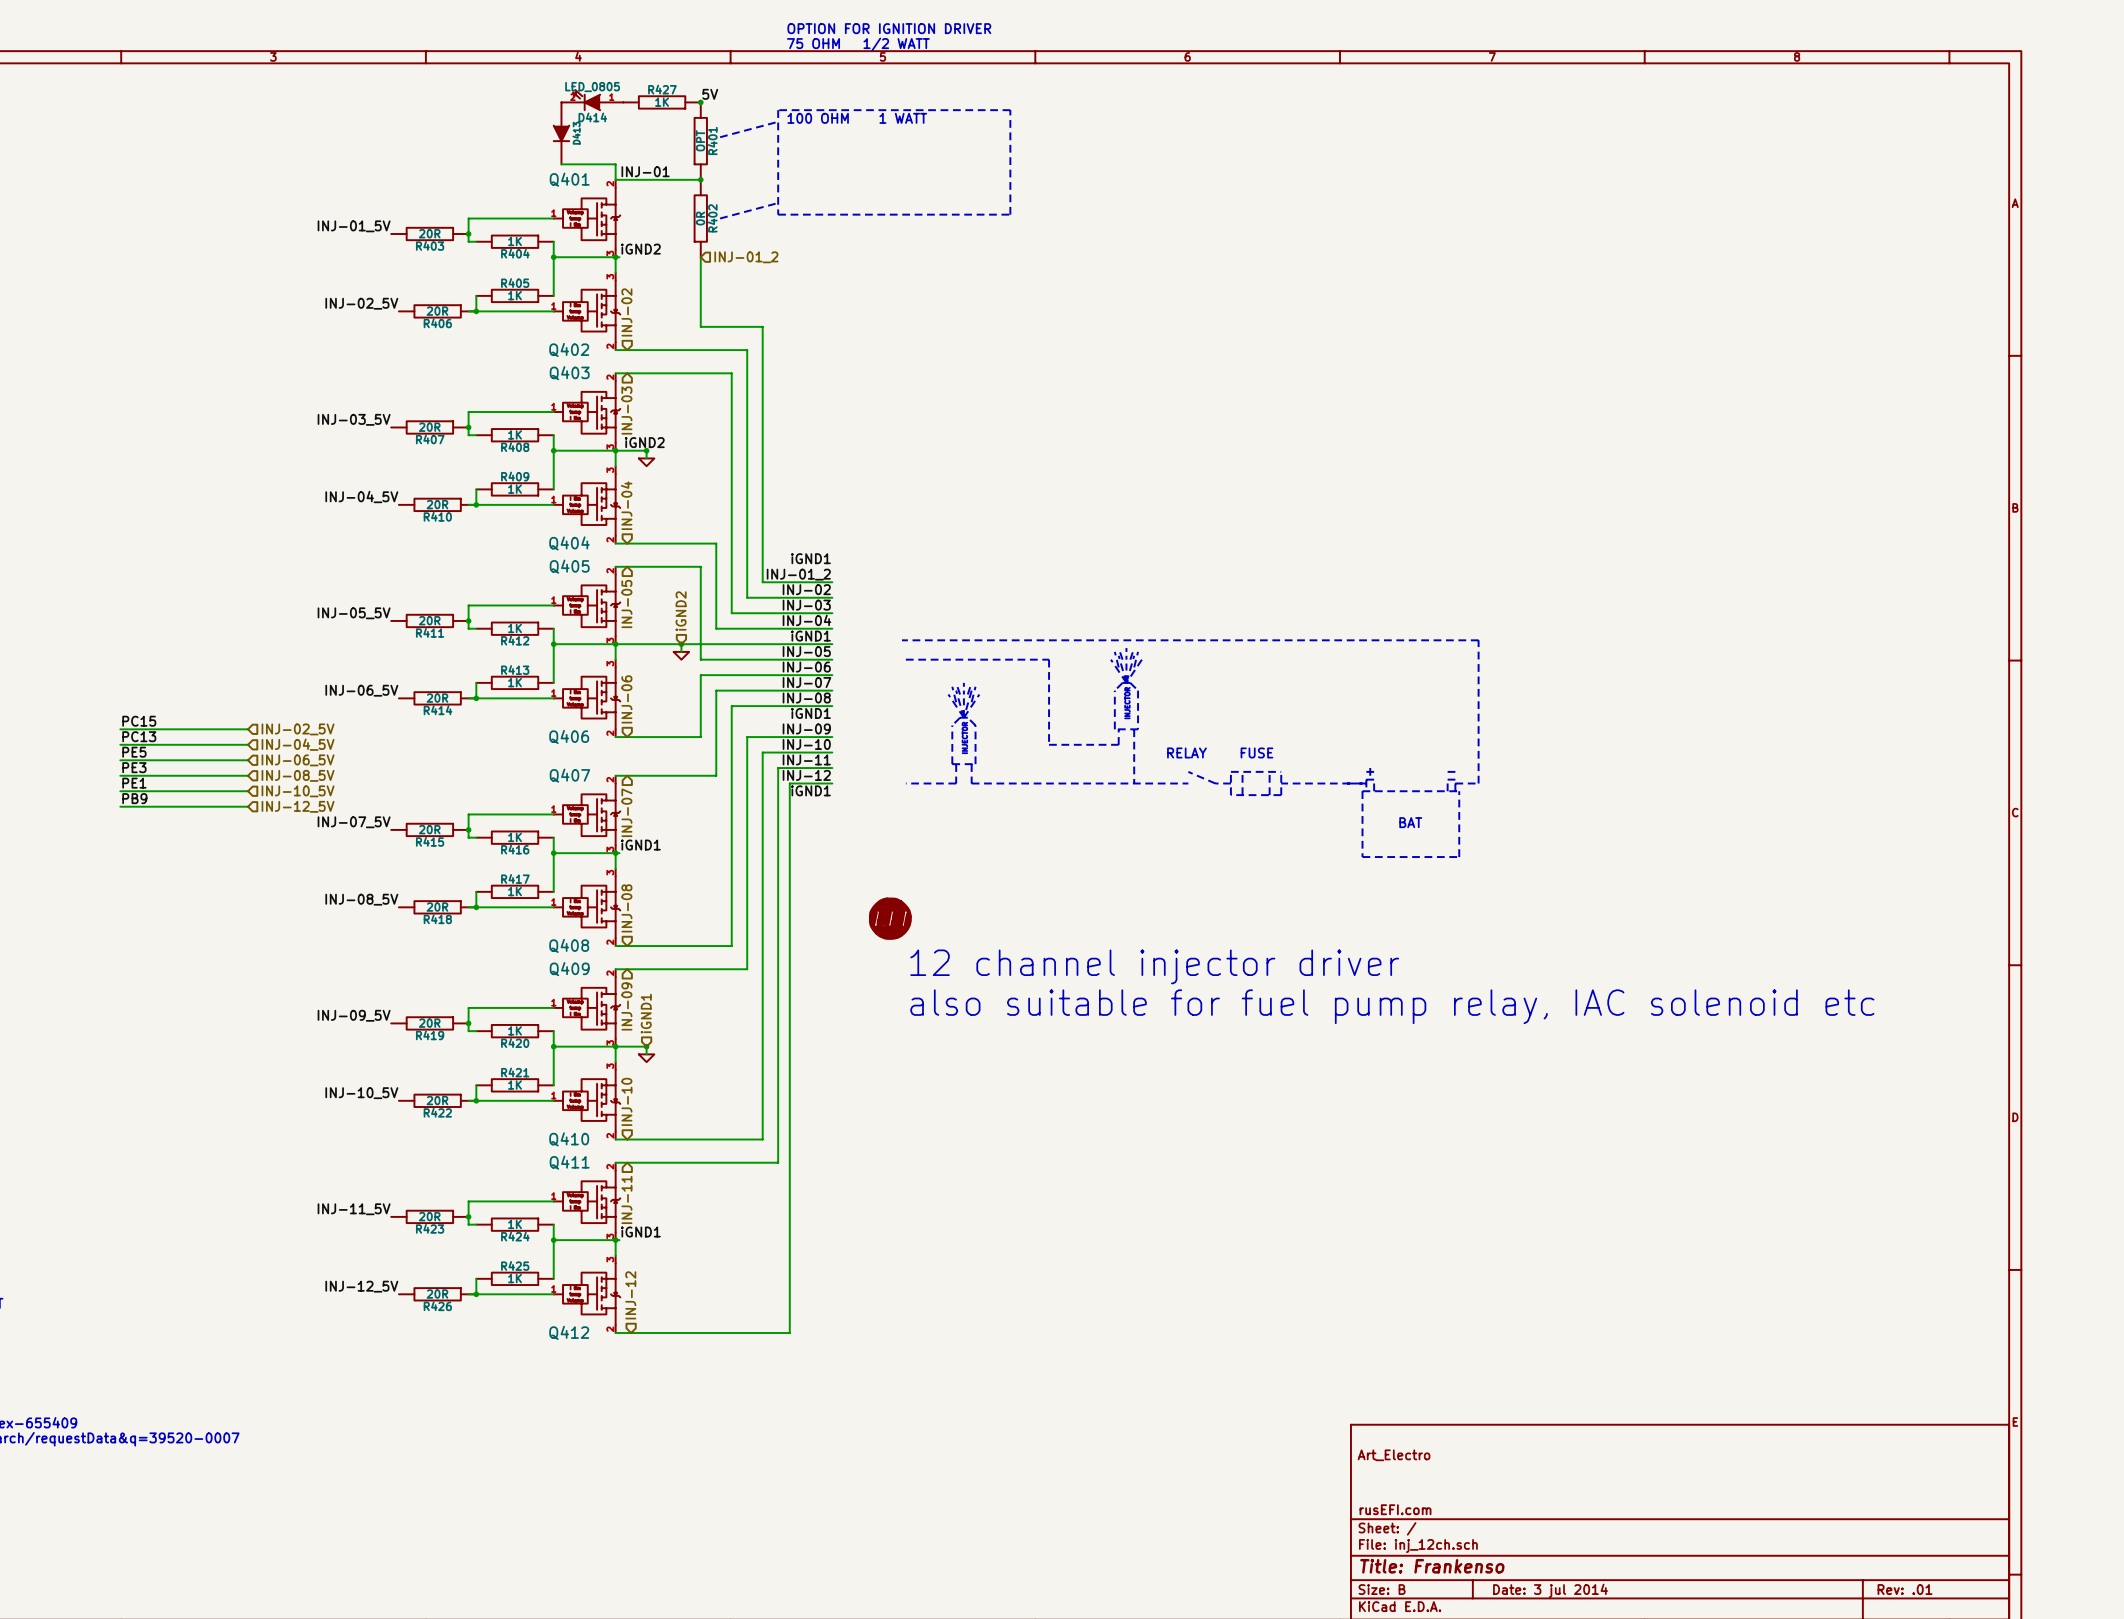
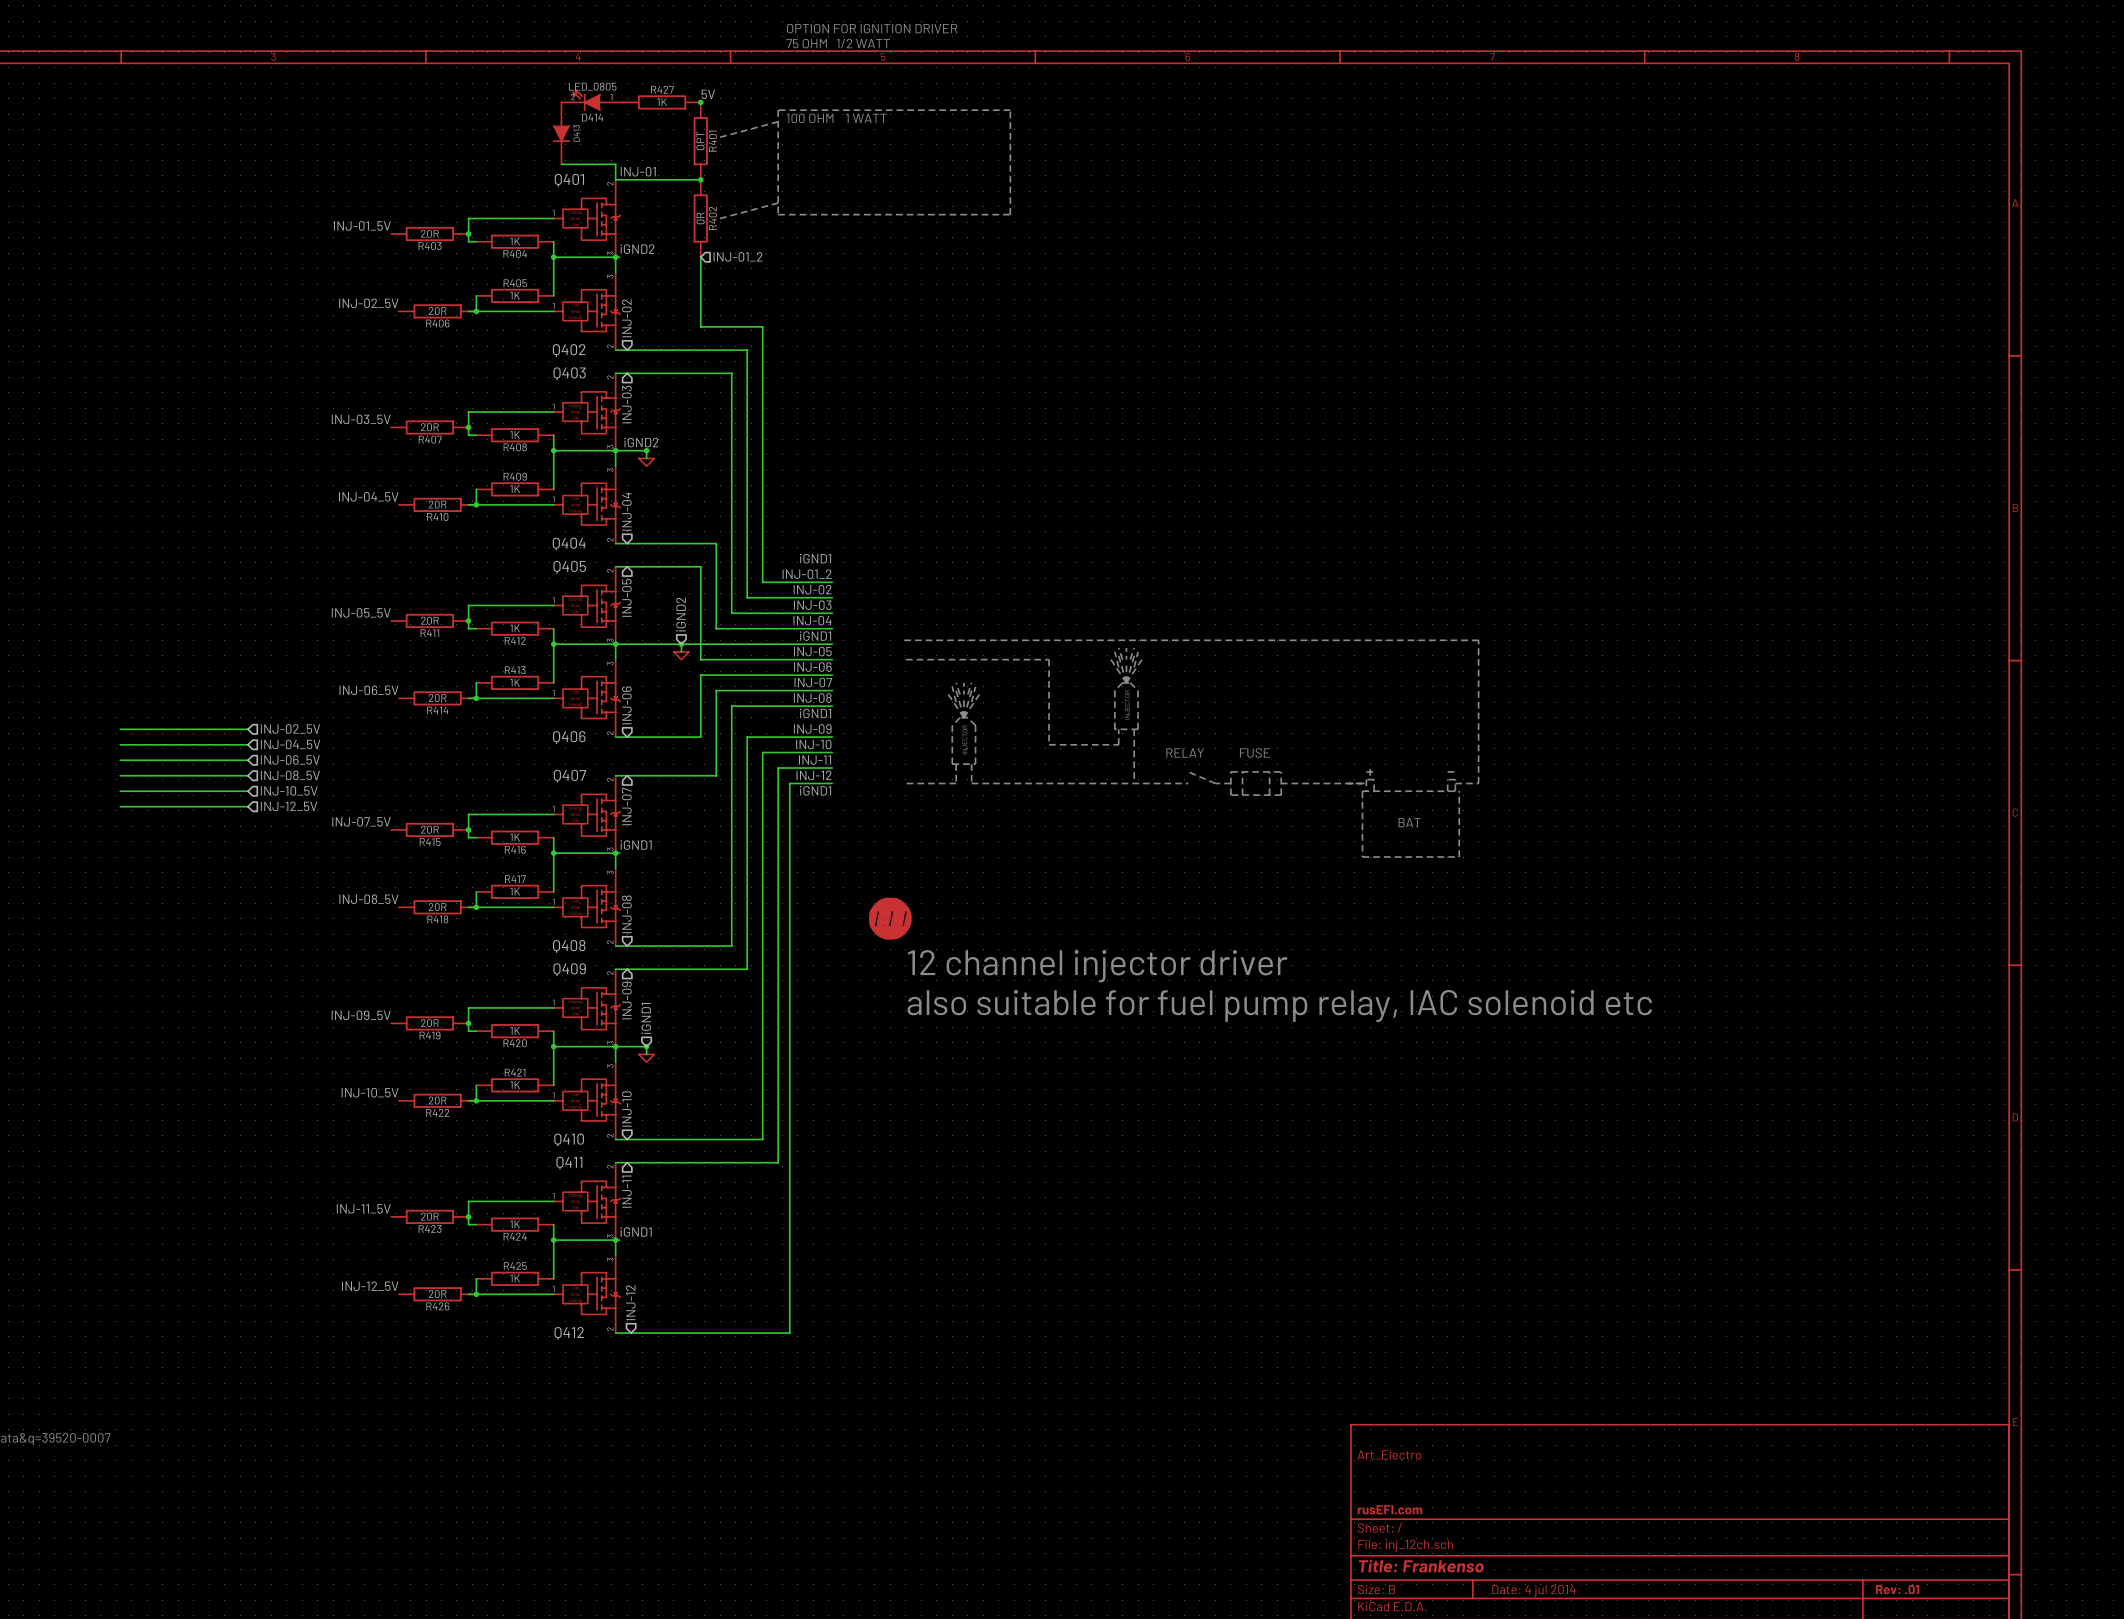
label: PC15 (139, 721) -> none
label: PC13 (139, 736) -> none
label: PE5 (134, 752) -> none
label: PE3 (134, 767) -> none
label: PE1 (134, 783) -> none
label: PB9 (134, 798) -> none
title block: Date: 3 jul 2014 (1550, 1590) -> Date: 4 jul 2014 (1533, 1590)

